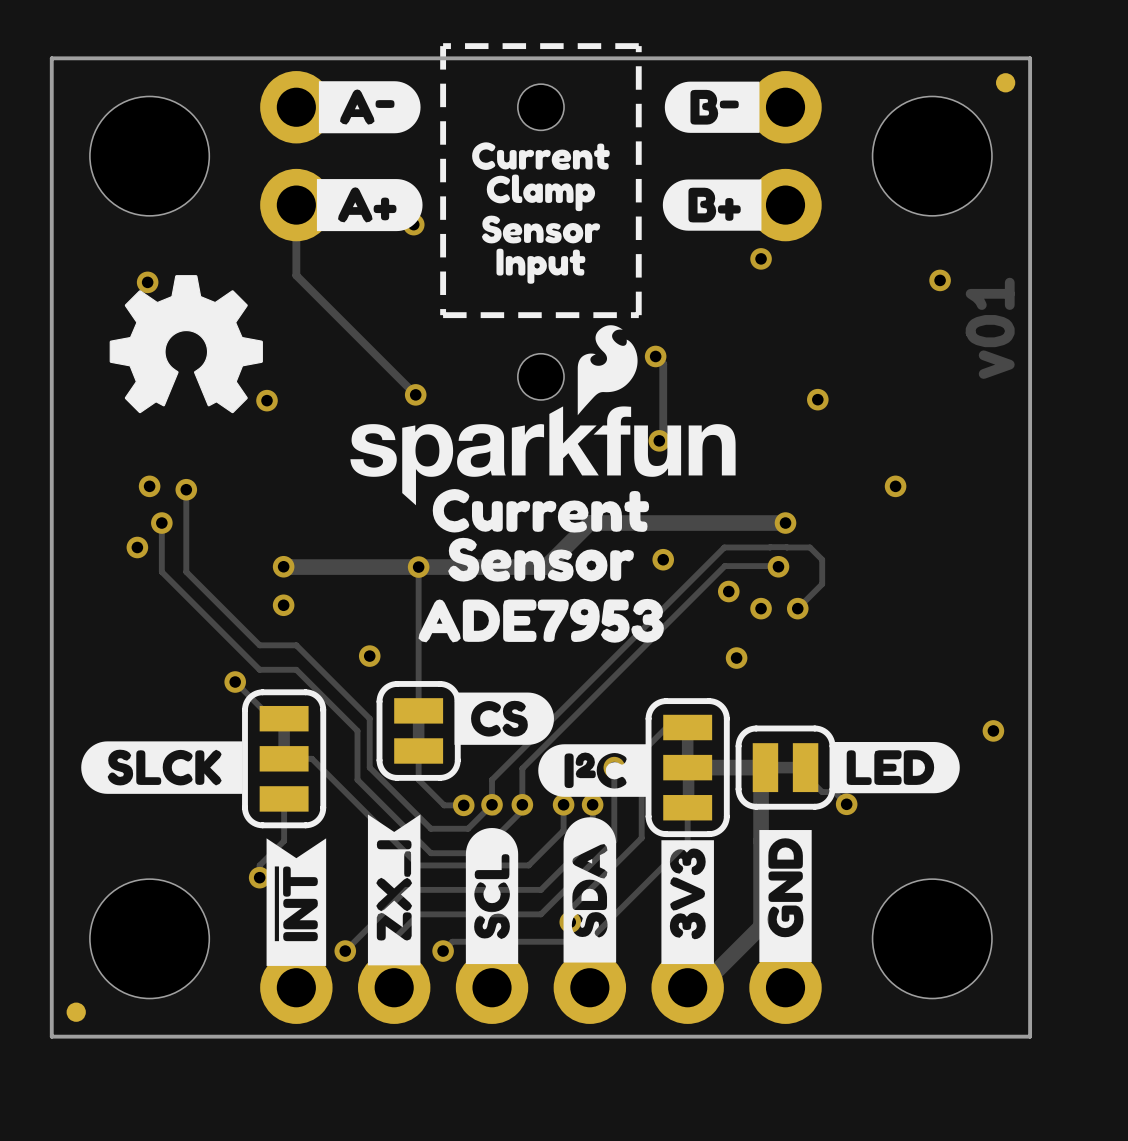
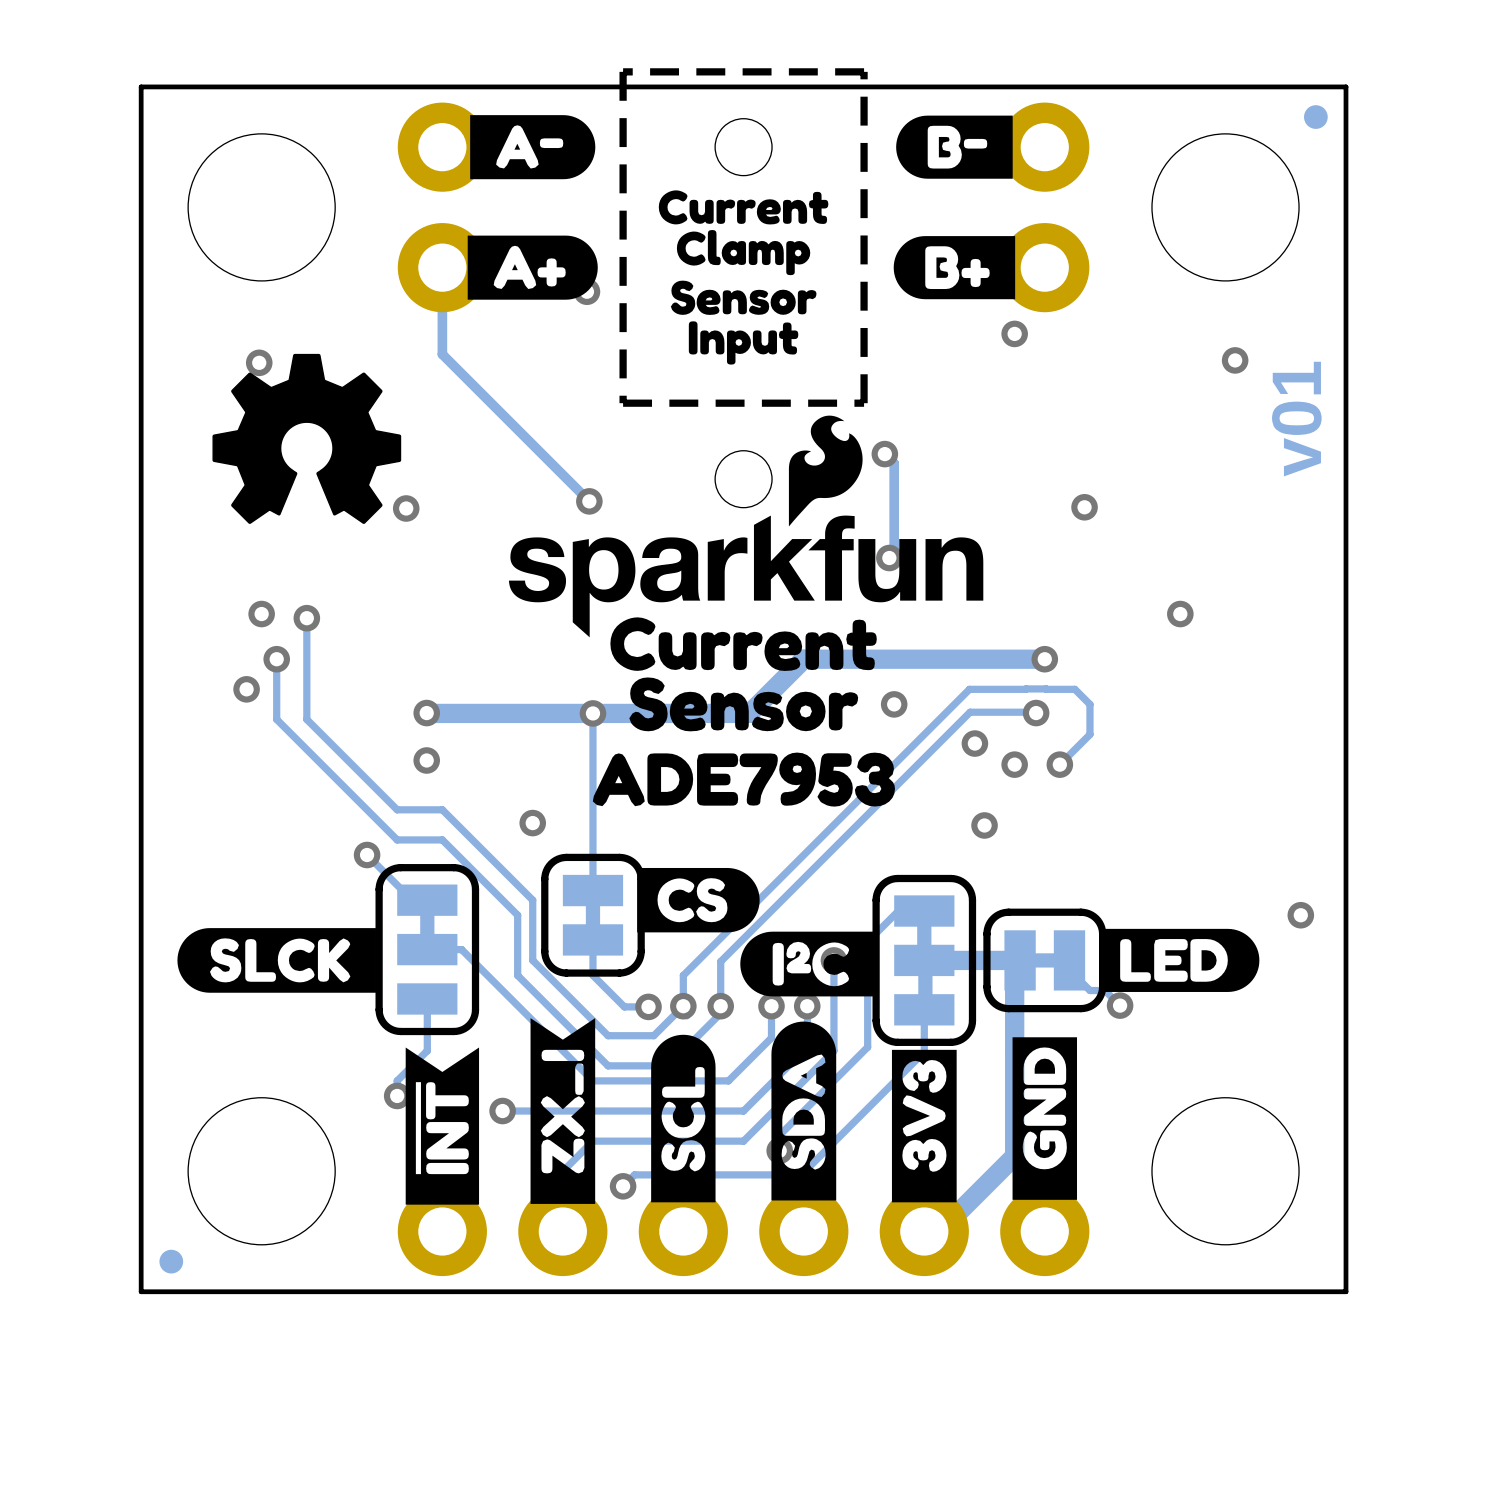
track: (406, 889) (345, 951) -> (577, 1111) (502, 1111)
via position: (345, 951) -> (502, 1111)

